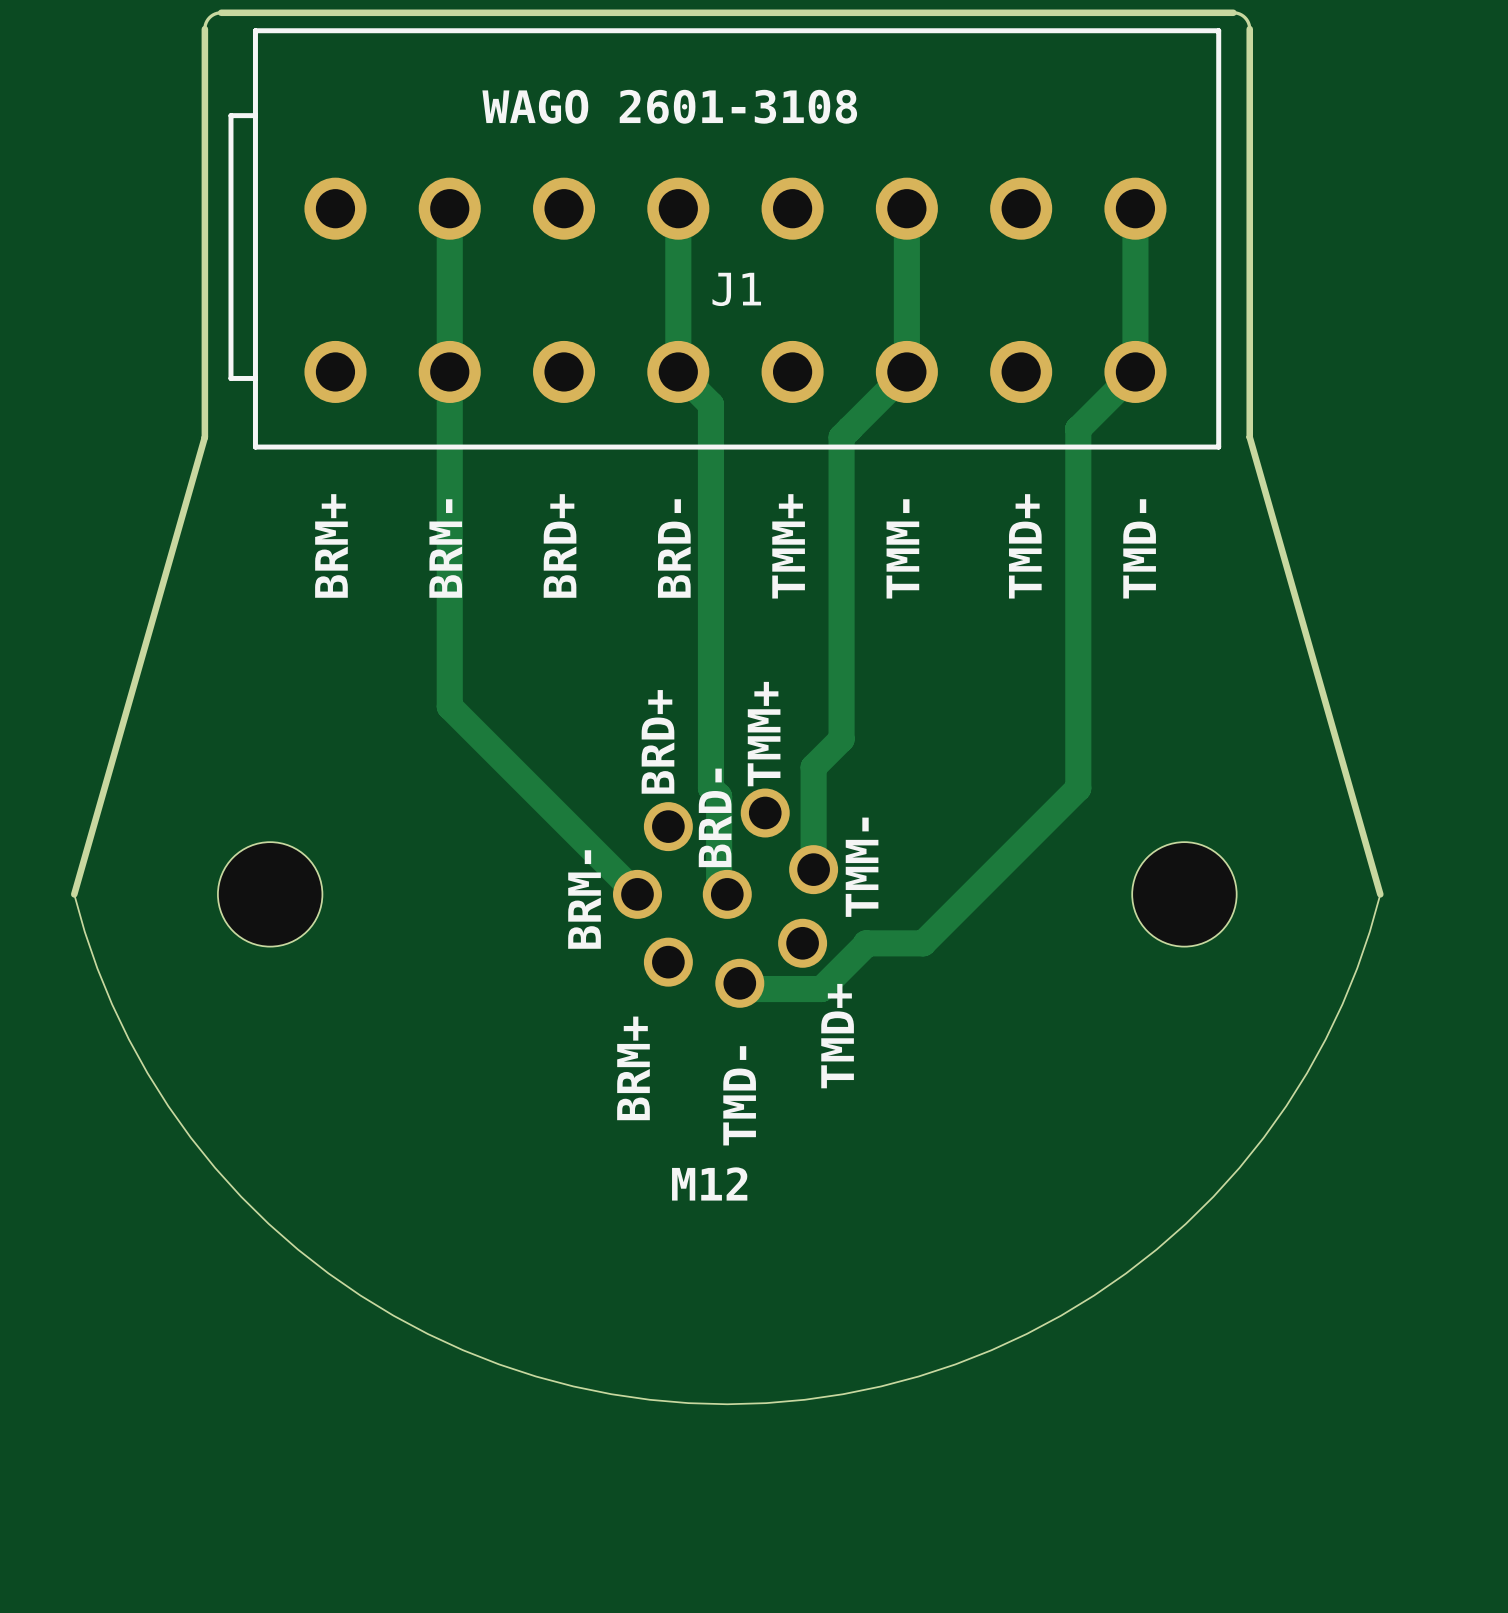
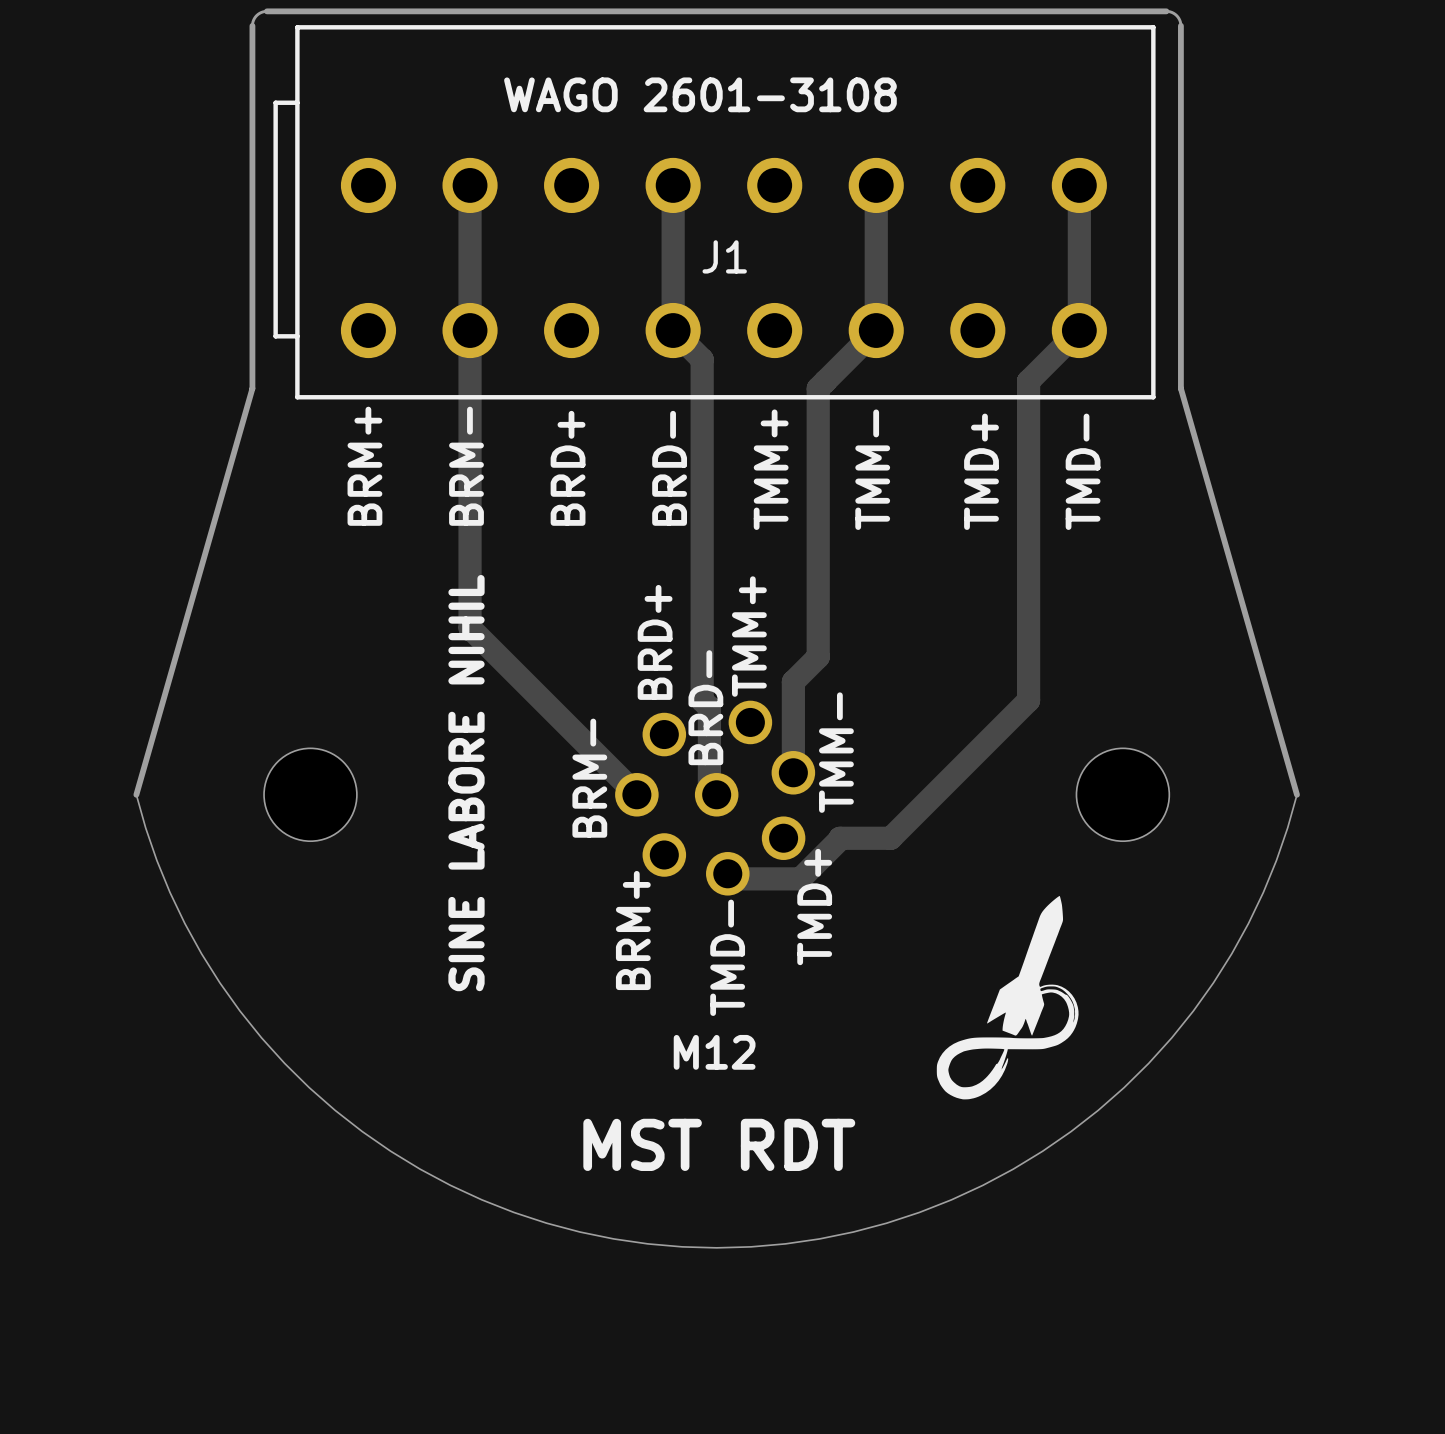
text: none -> SINE LABORE NIHIL (466, 783)
drawing: none -> [936, 895, 1079, 1100]
text: none -> MST RDT (719, 1144)

